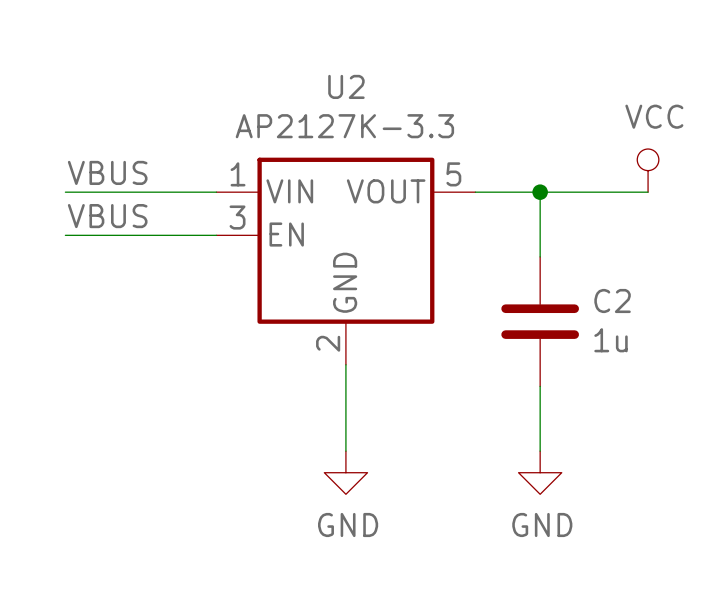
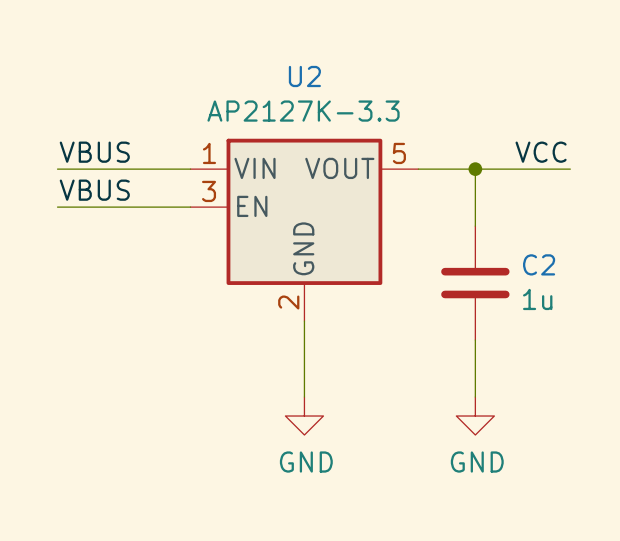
power symbol: VCC (648, 170) -> none
label: none -> VCC (541, 152)

